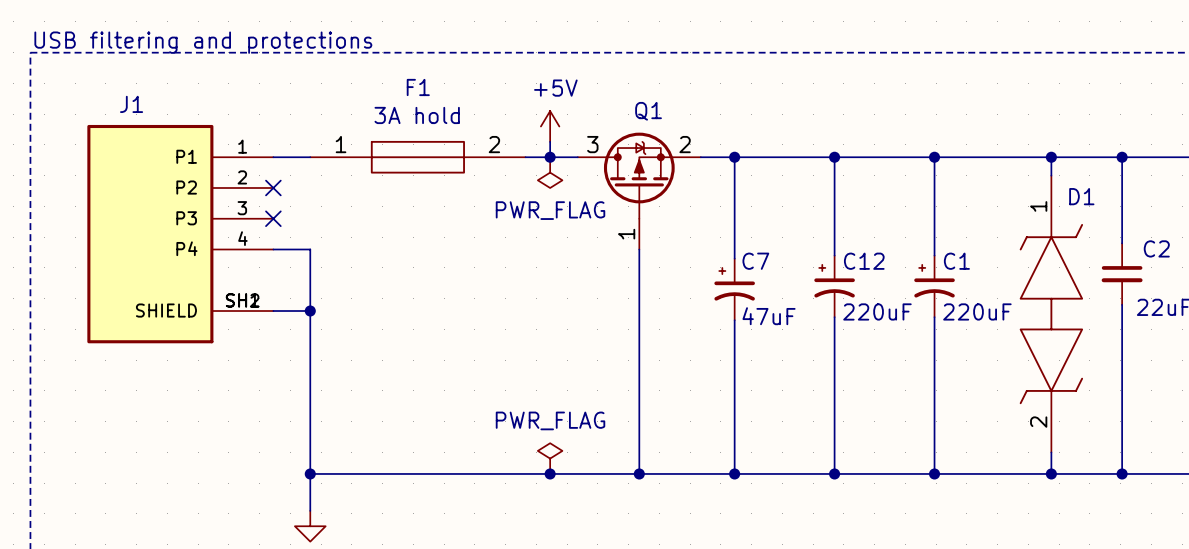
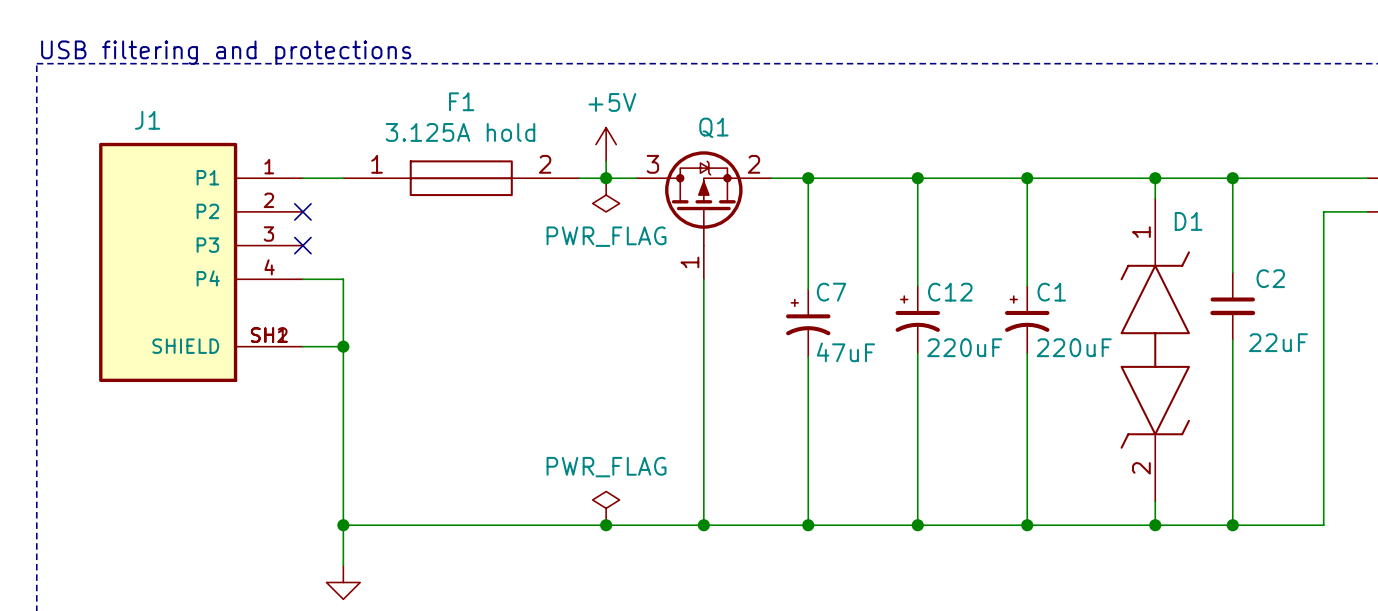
F1 value: 3A hold (417, 115) -> 3.125A hold (460, 132)

